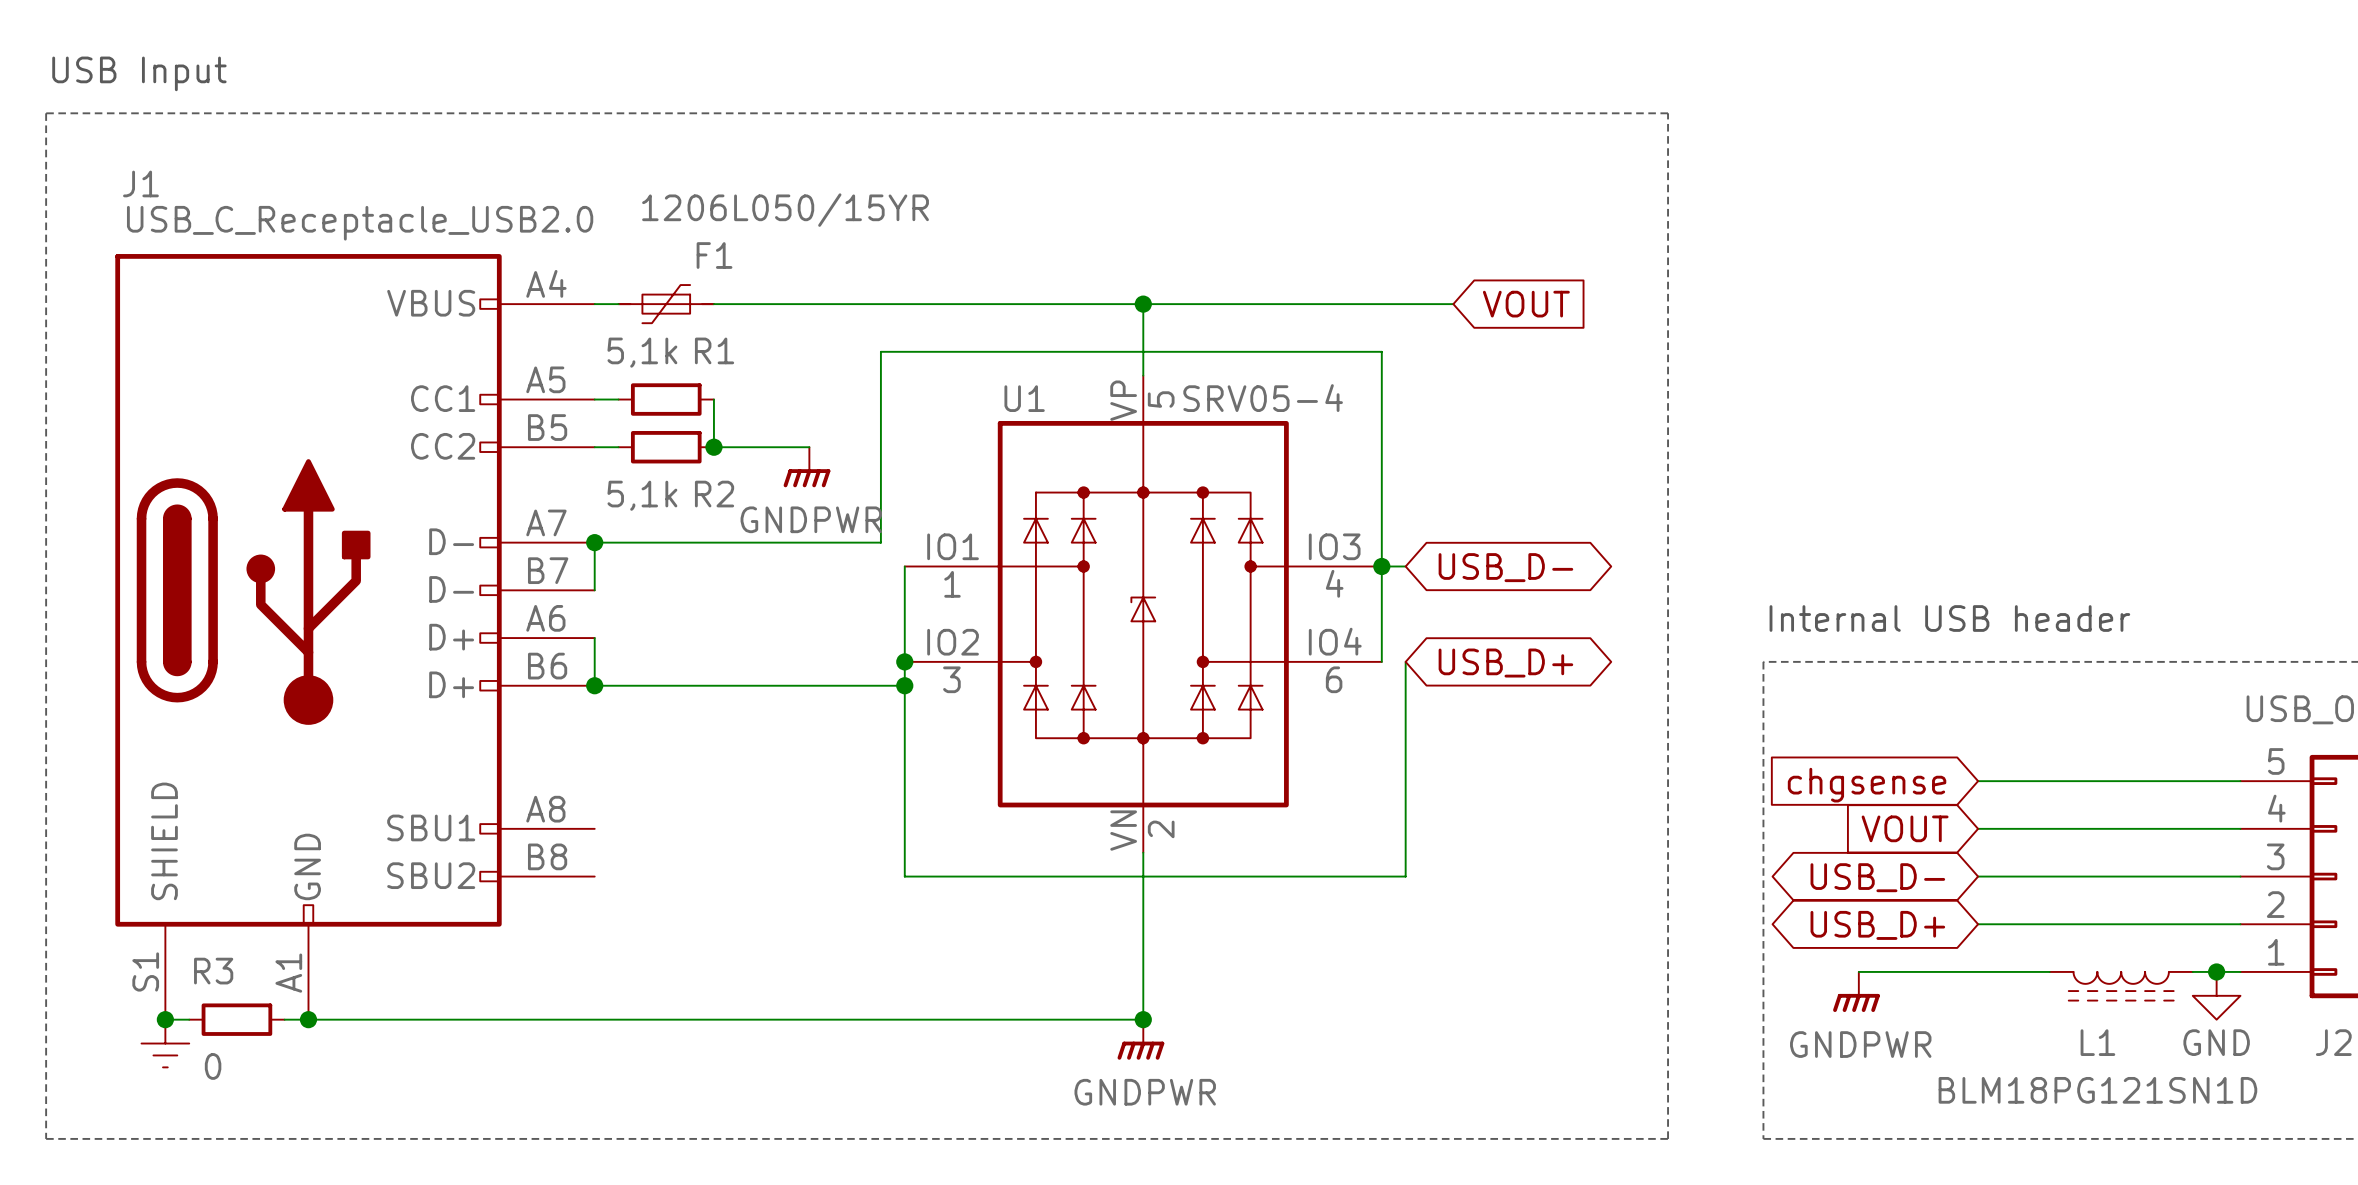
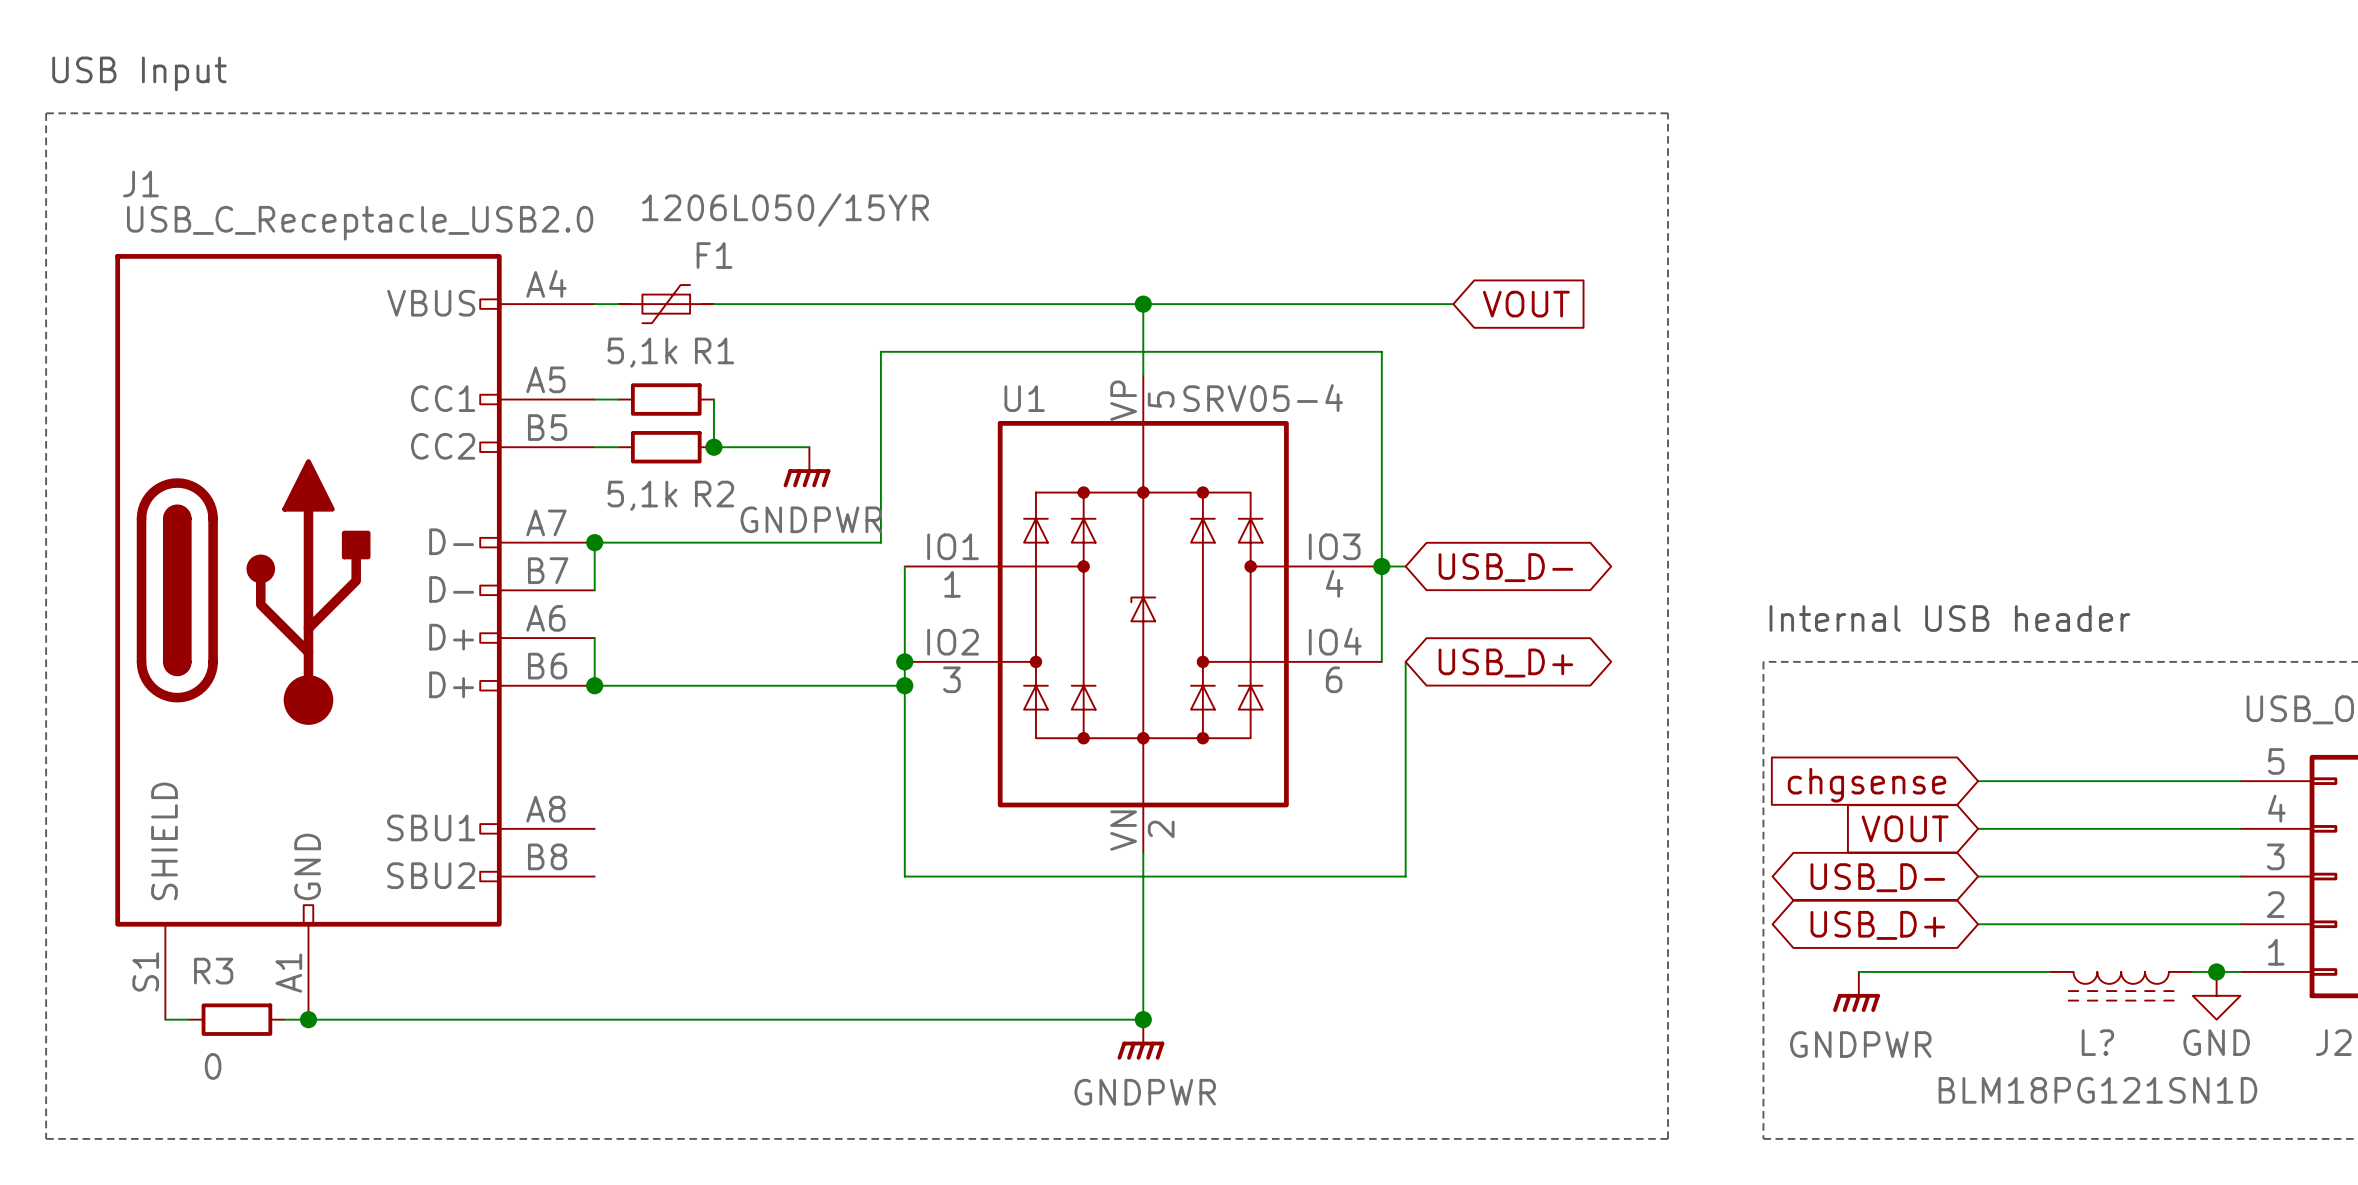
junction: (165, 1019) -> none
L1 name: L1 (2097, 1042) -> L? (2097, 1042)
power symbol: (165, 1043) -> none

